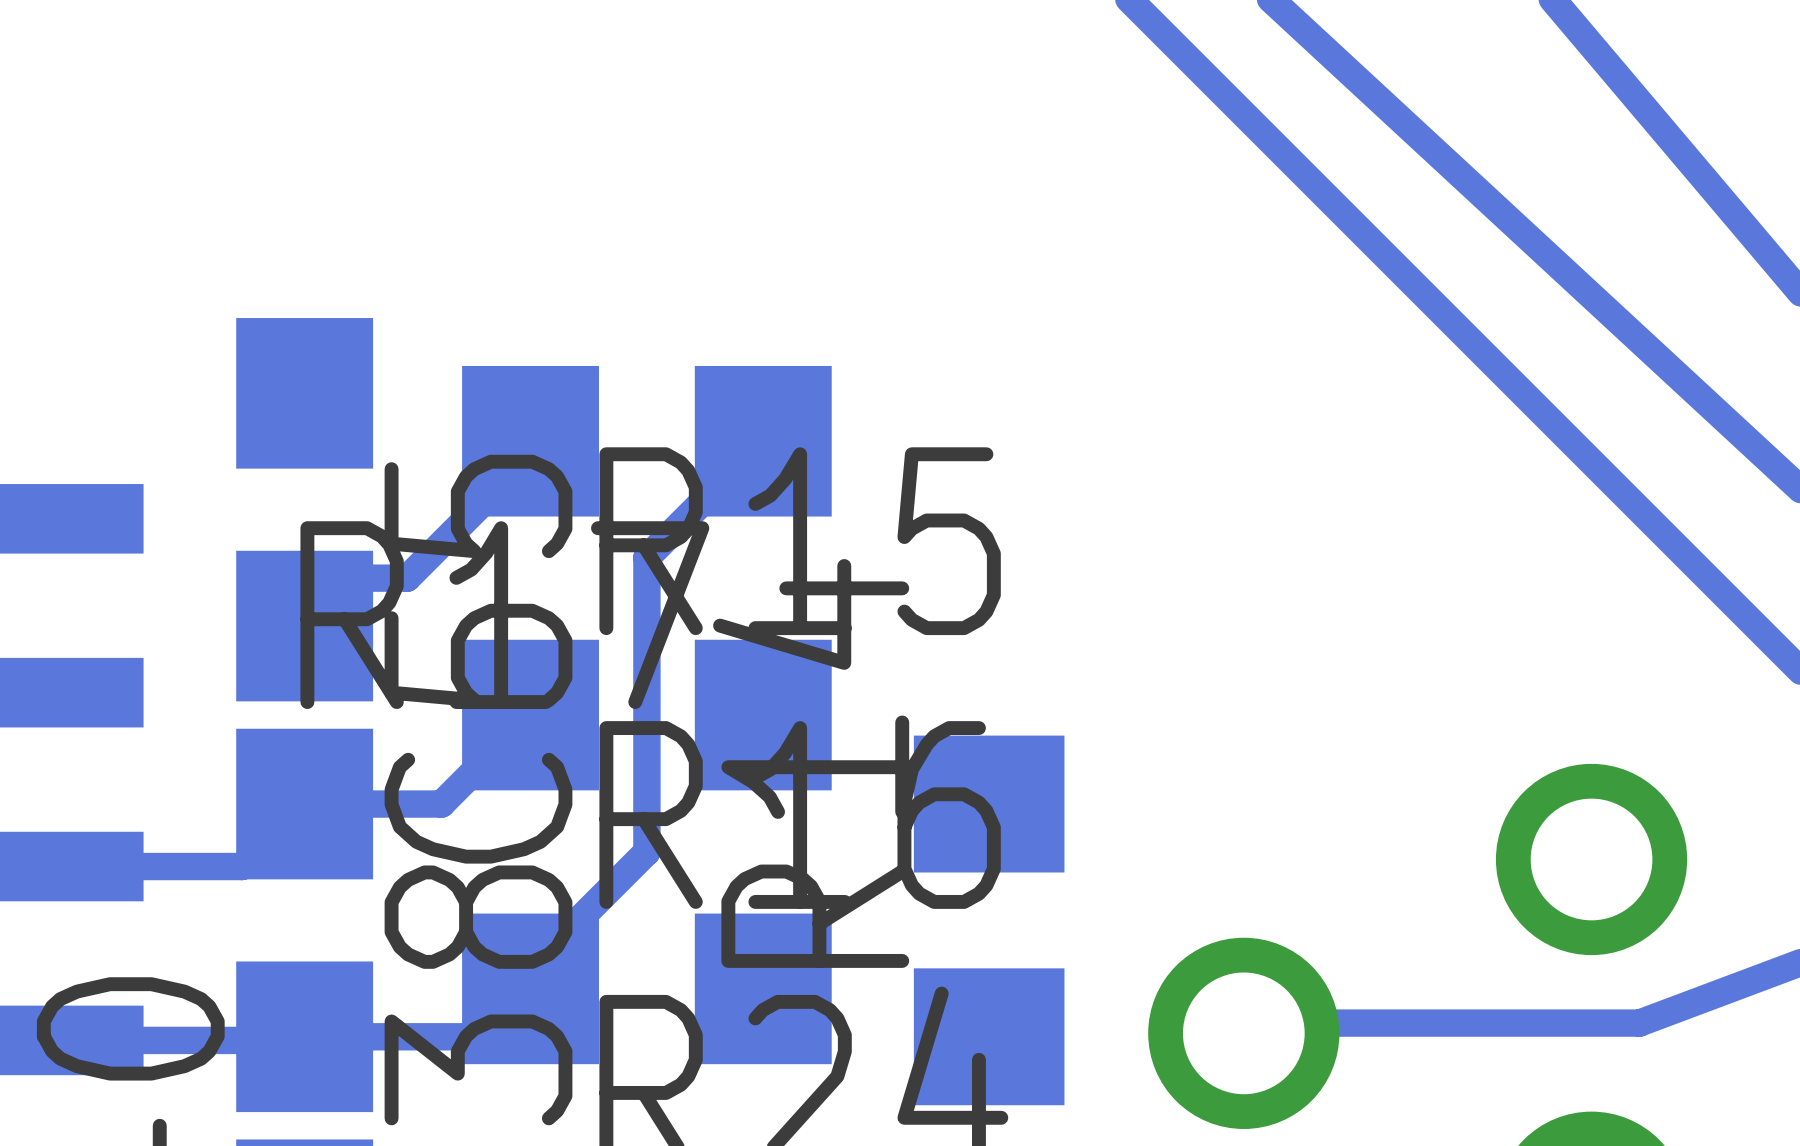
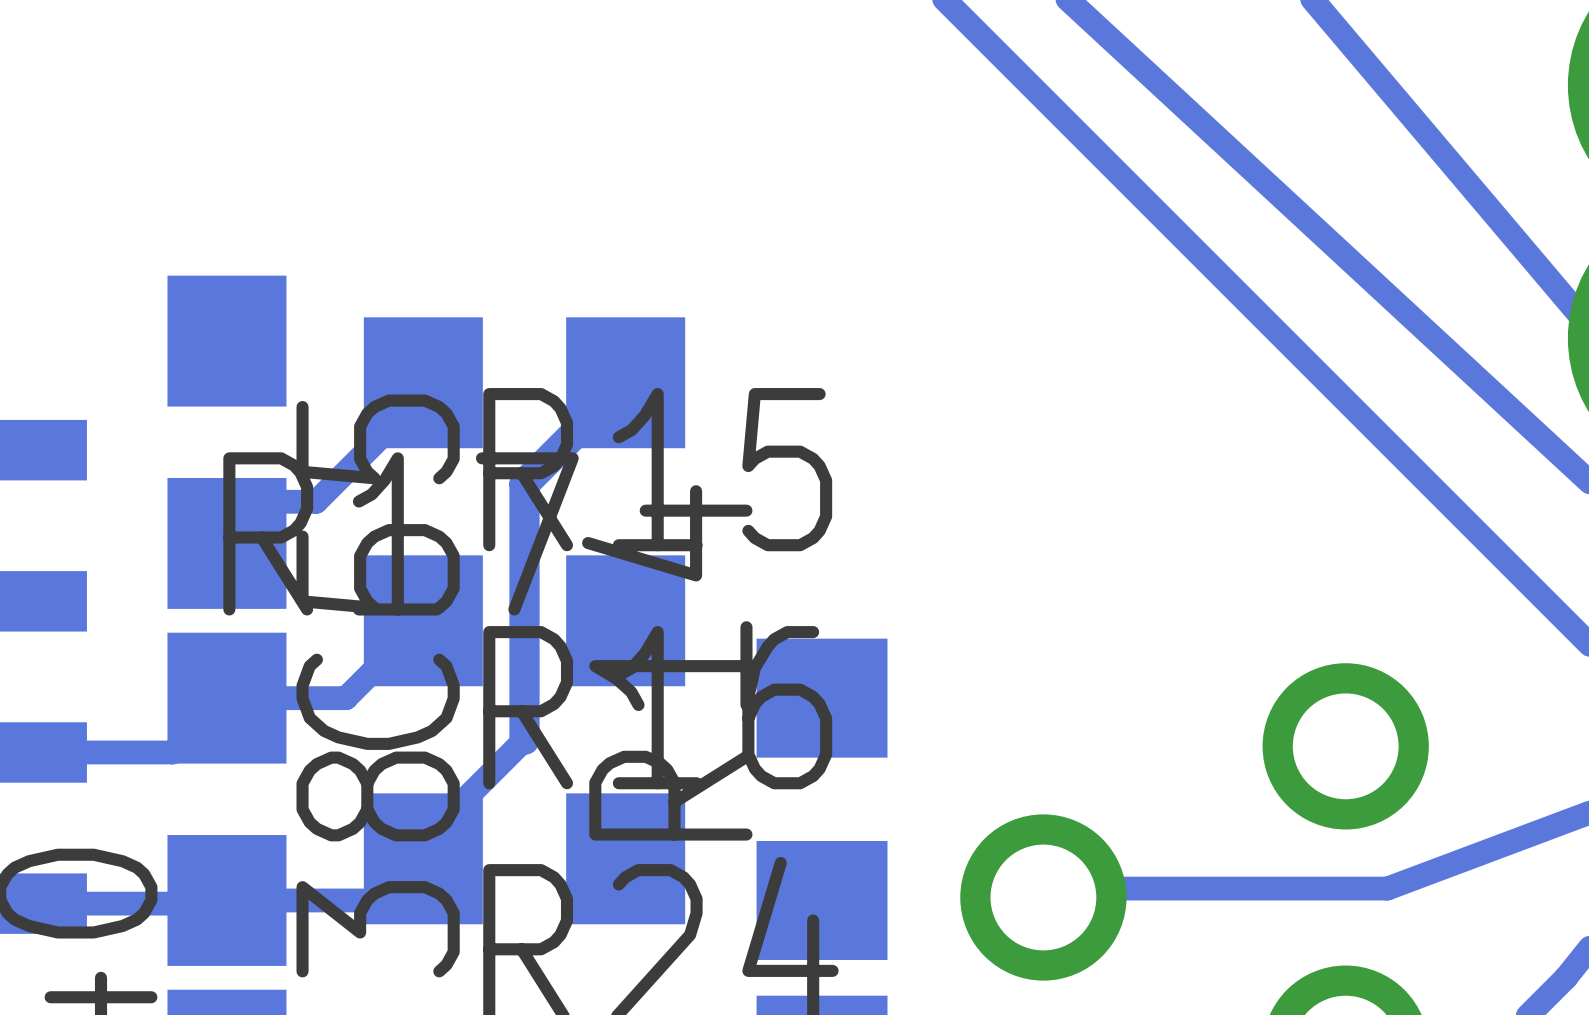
track width: thin (763, 441) (646, 557) (646, 851) -> thick (625, 382) (524, 483) (524, 739)

